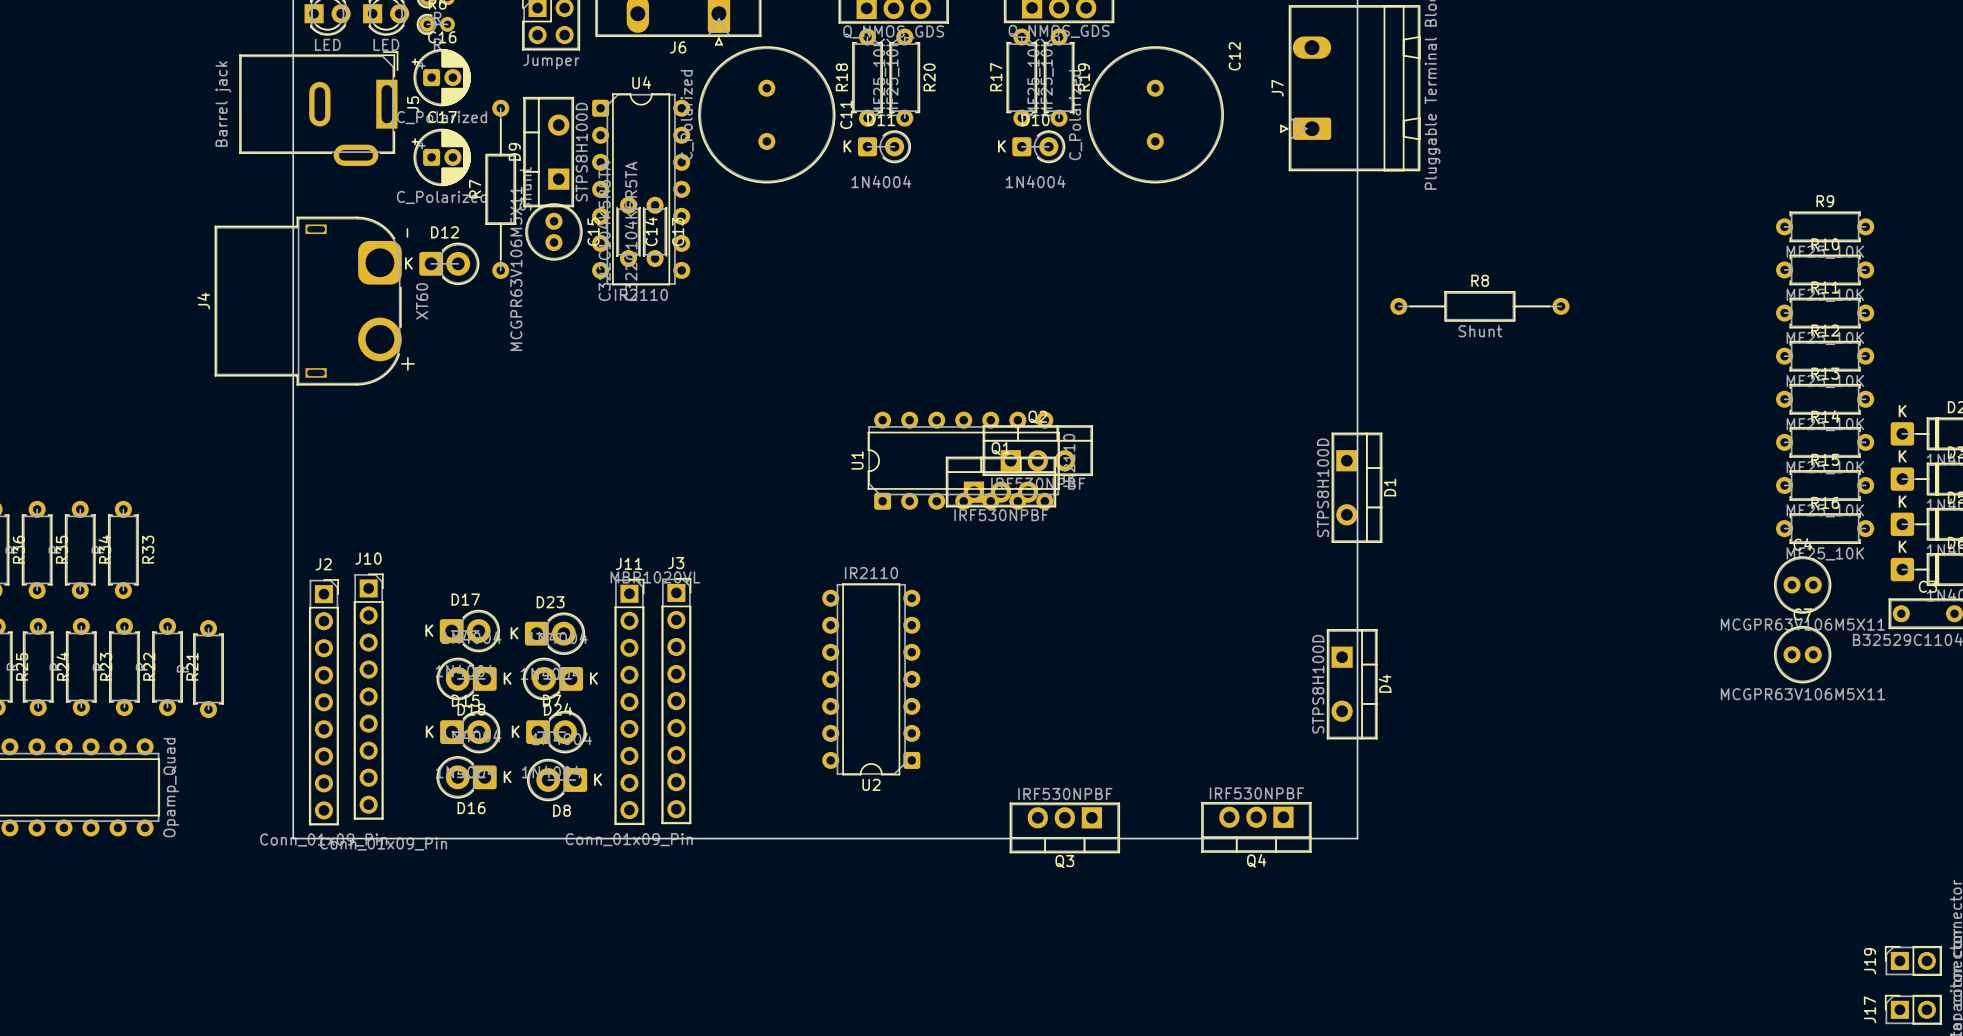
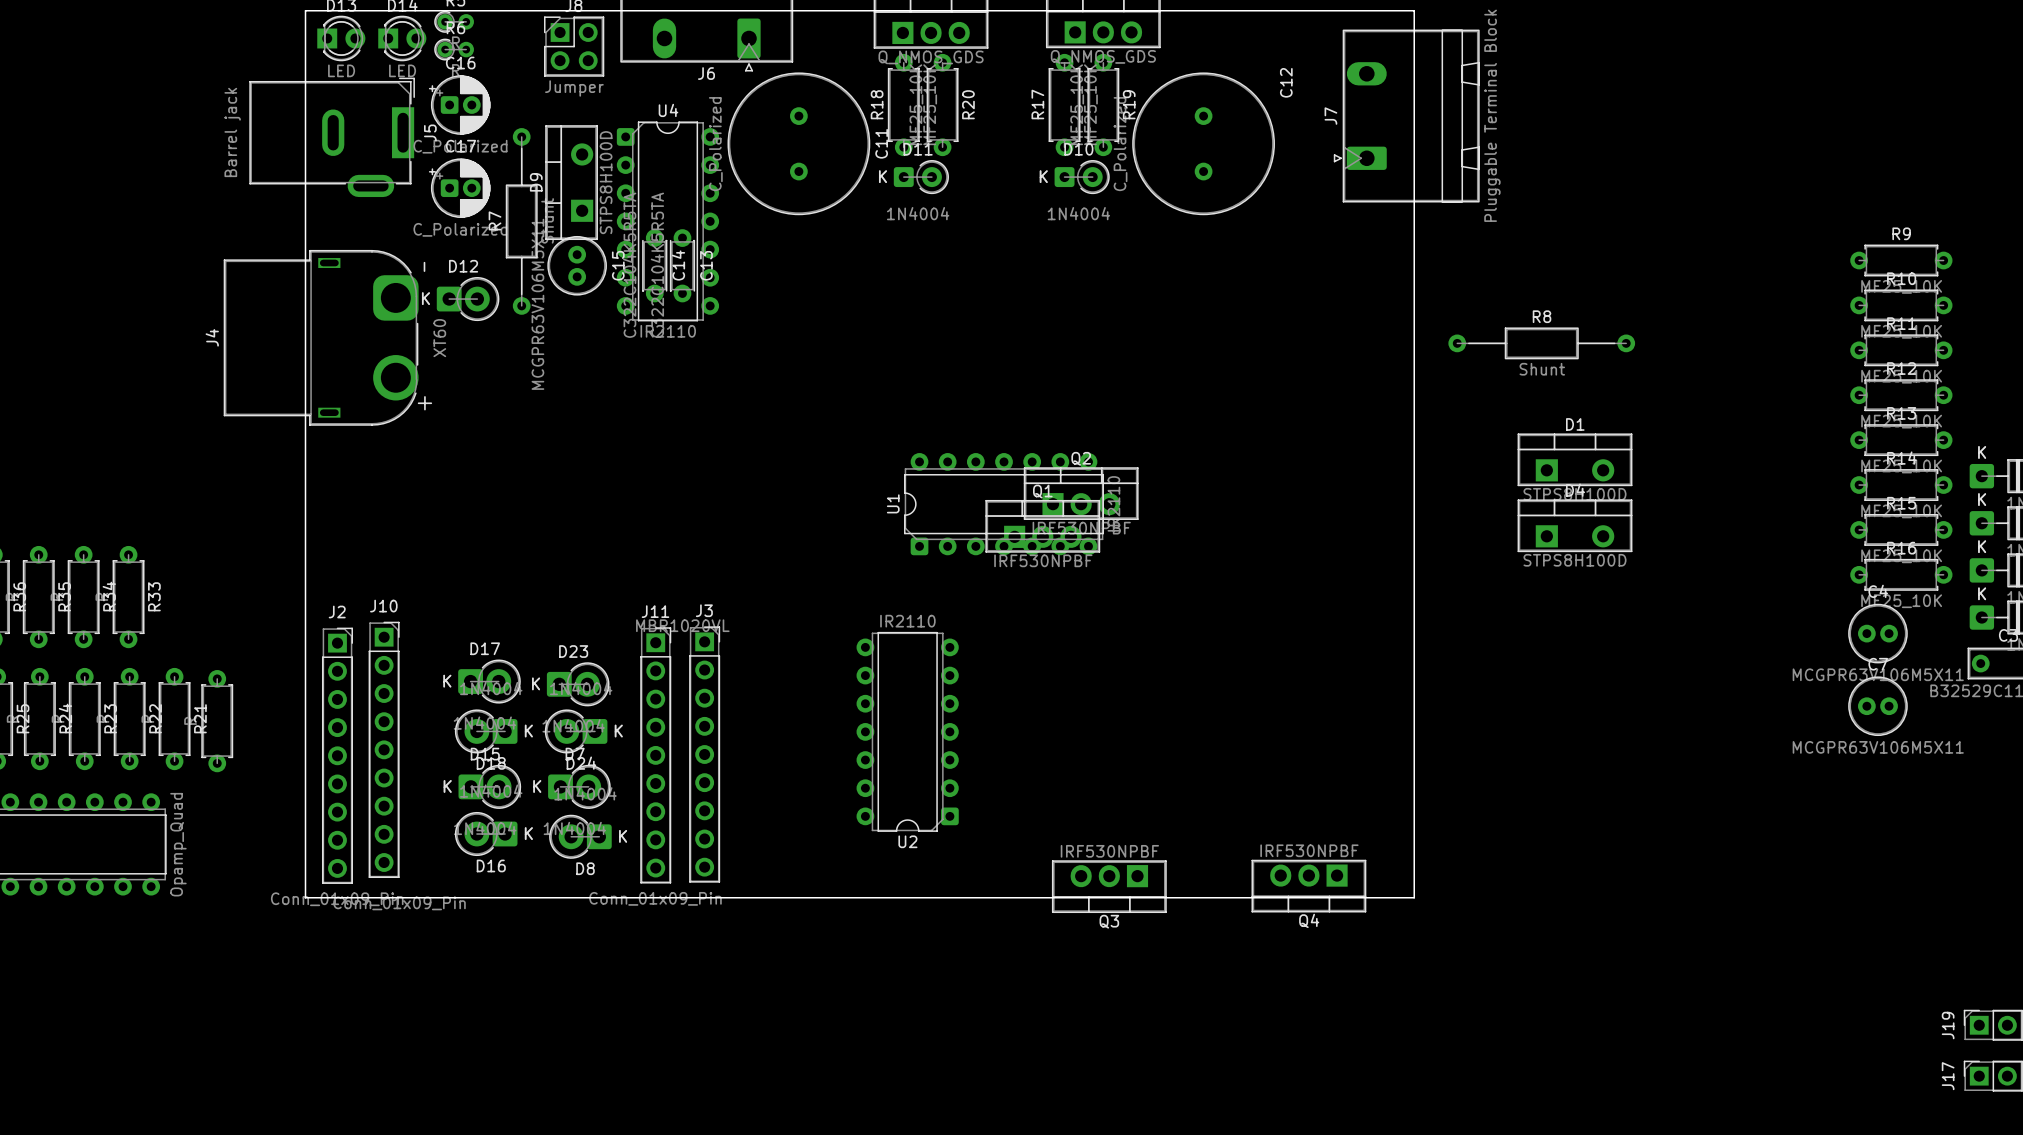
D1 rotation: 0° (1356, 487) -> 90° counterclockwise (1575, 459)
D1 position: (1356, 487) -> (1575, 459)
D4 rotation: 0° (1352, 684) -> 90° counterclockwise (1575, 525)
D4 position: (1352, 684) -> (1575, 525)

